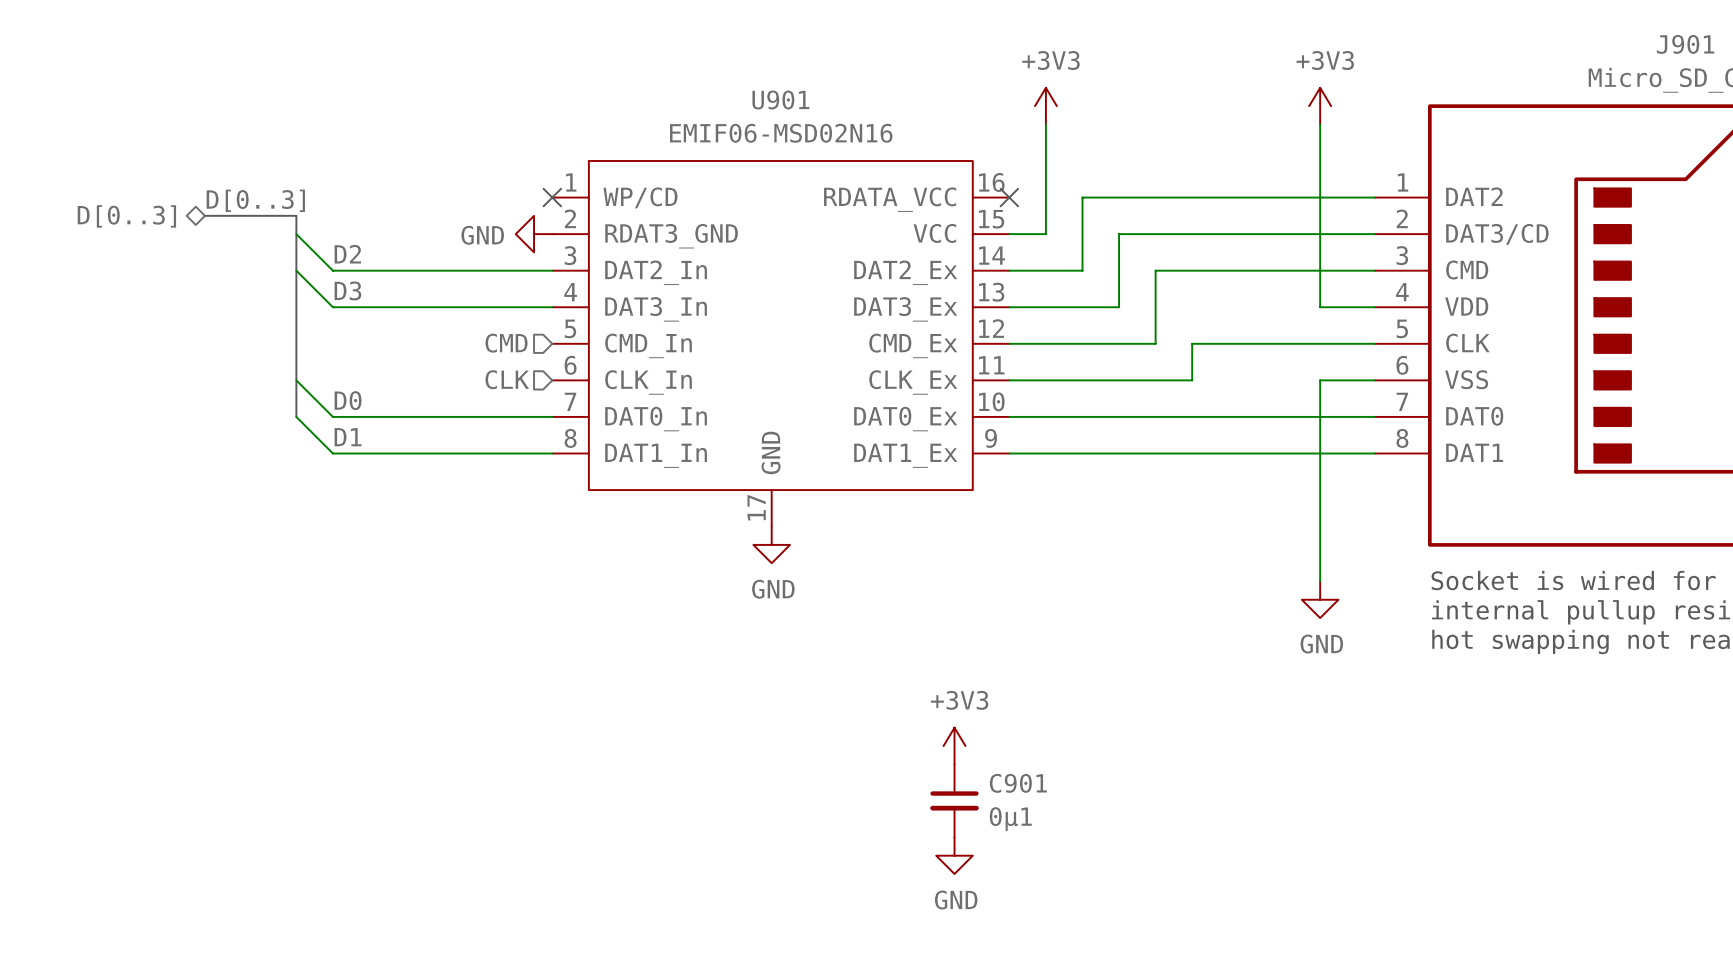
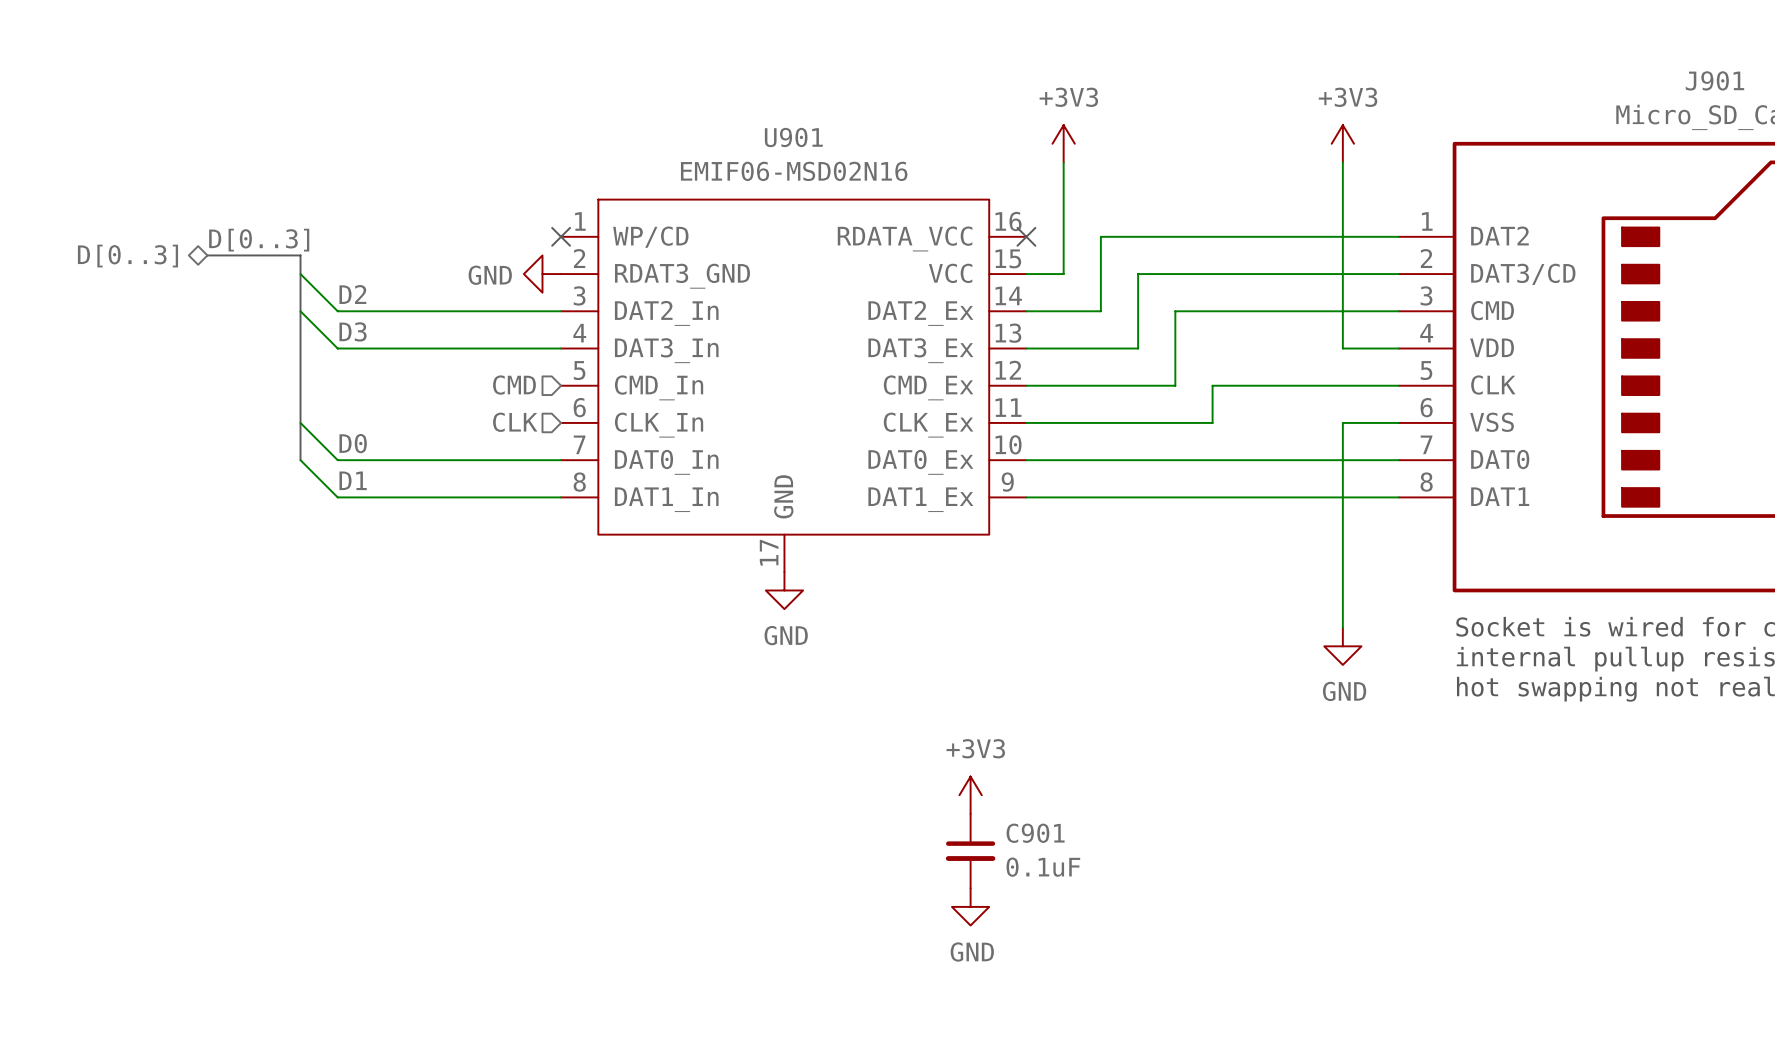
C901 value: 0µ1 (1010, 819) -> 0.1uF (1043, 867)

